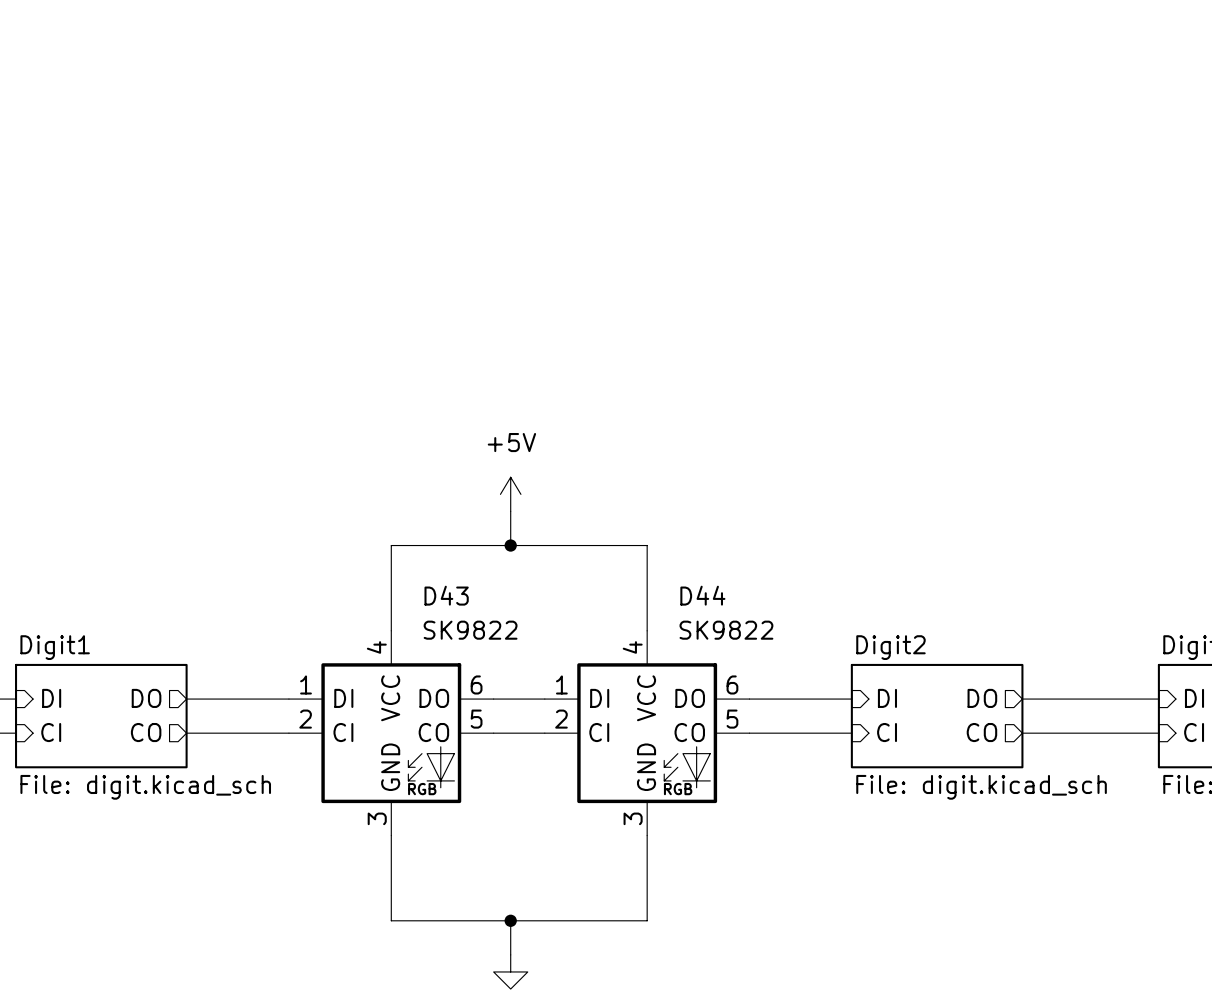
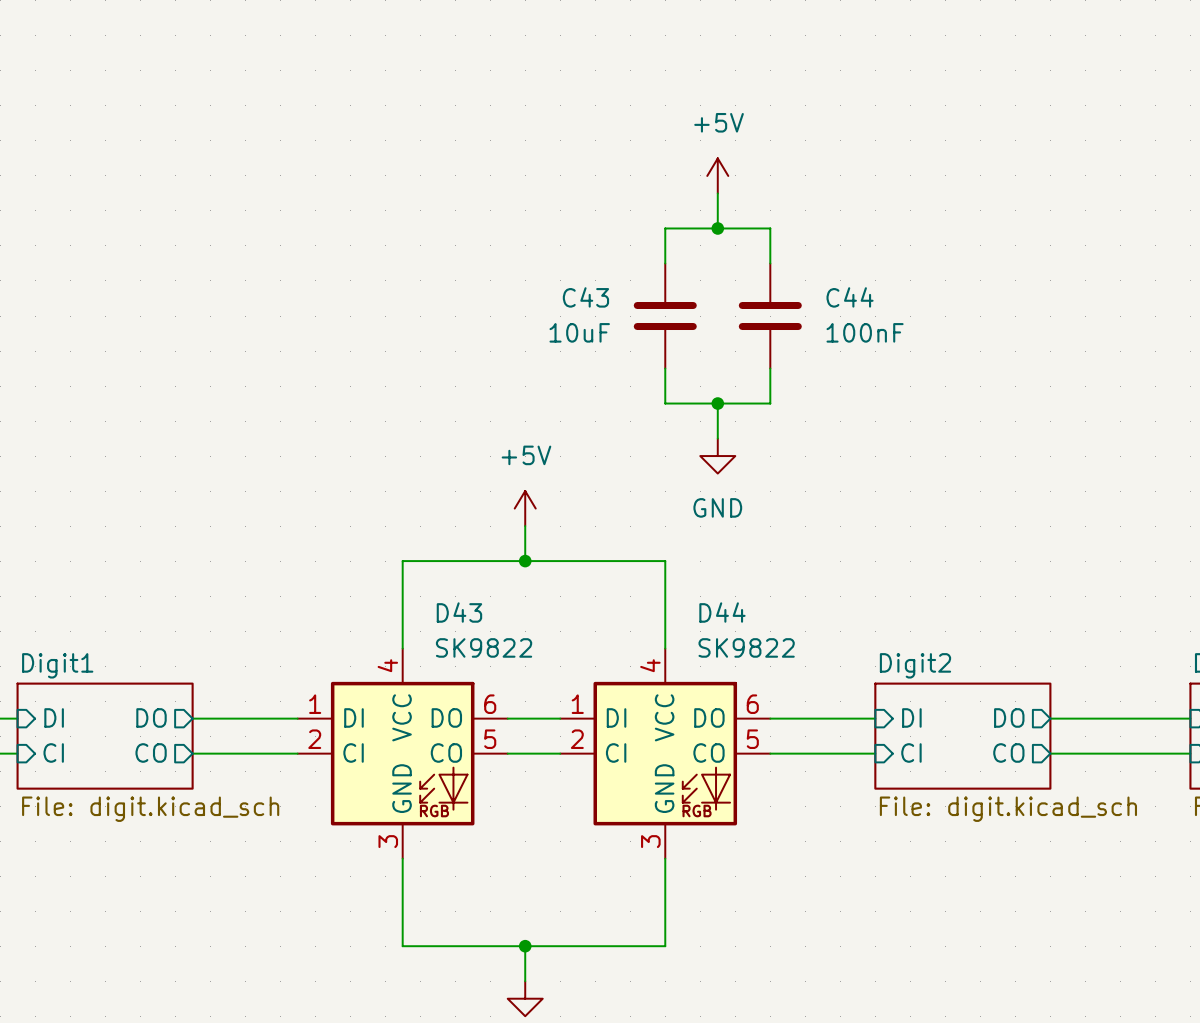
power symbol: none -> +5V (717, 175)
wire: none -> (717, 193) (717, 228)
junction: none -> (717, 228)
wire: none -> (665, 263) (665, 228) (770, 228) (770, 263)
C43: none -> 10uF (665, 316)
C44: none -> 100nF (770, 316)
wire: none -> (665, 368) (665, 403) (770, 403) (770, 368)
wire: none -> (717, 403) (717, 438)
junction: none -> (717, 403)
power symbol: none -> GND (717, 456)

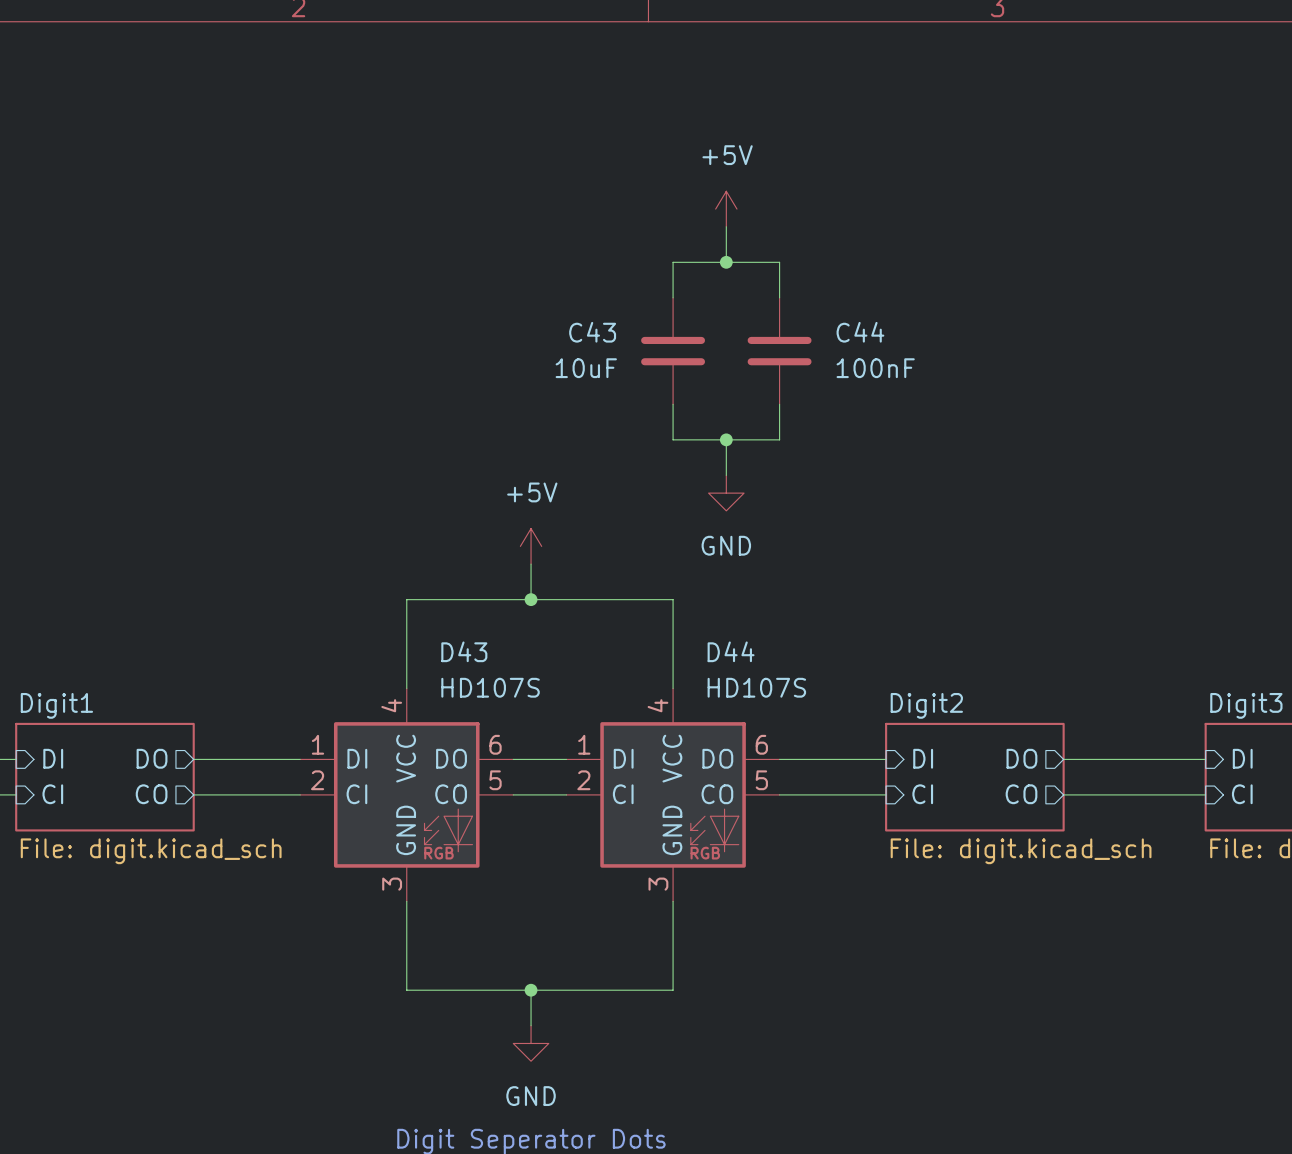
D43 value: SK9822 (484, 647) -> HD107S (490, 687)
D44 value: SK9822 (746, 647) -> HD107S (756, 687)

